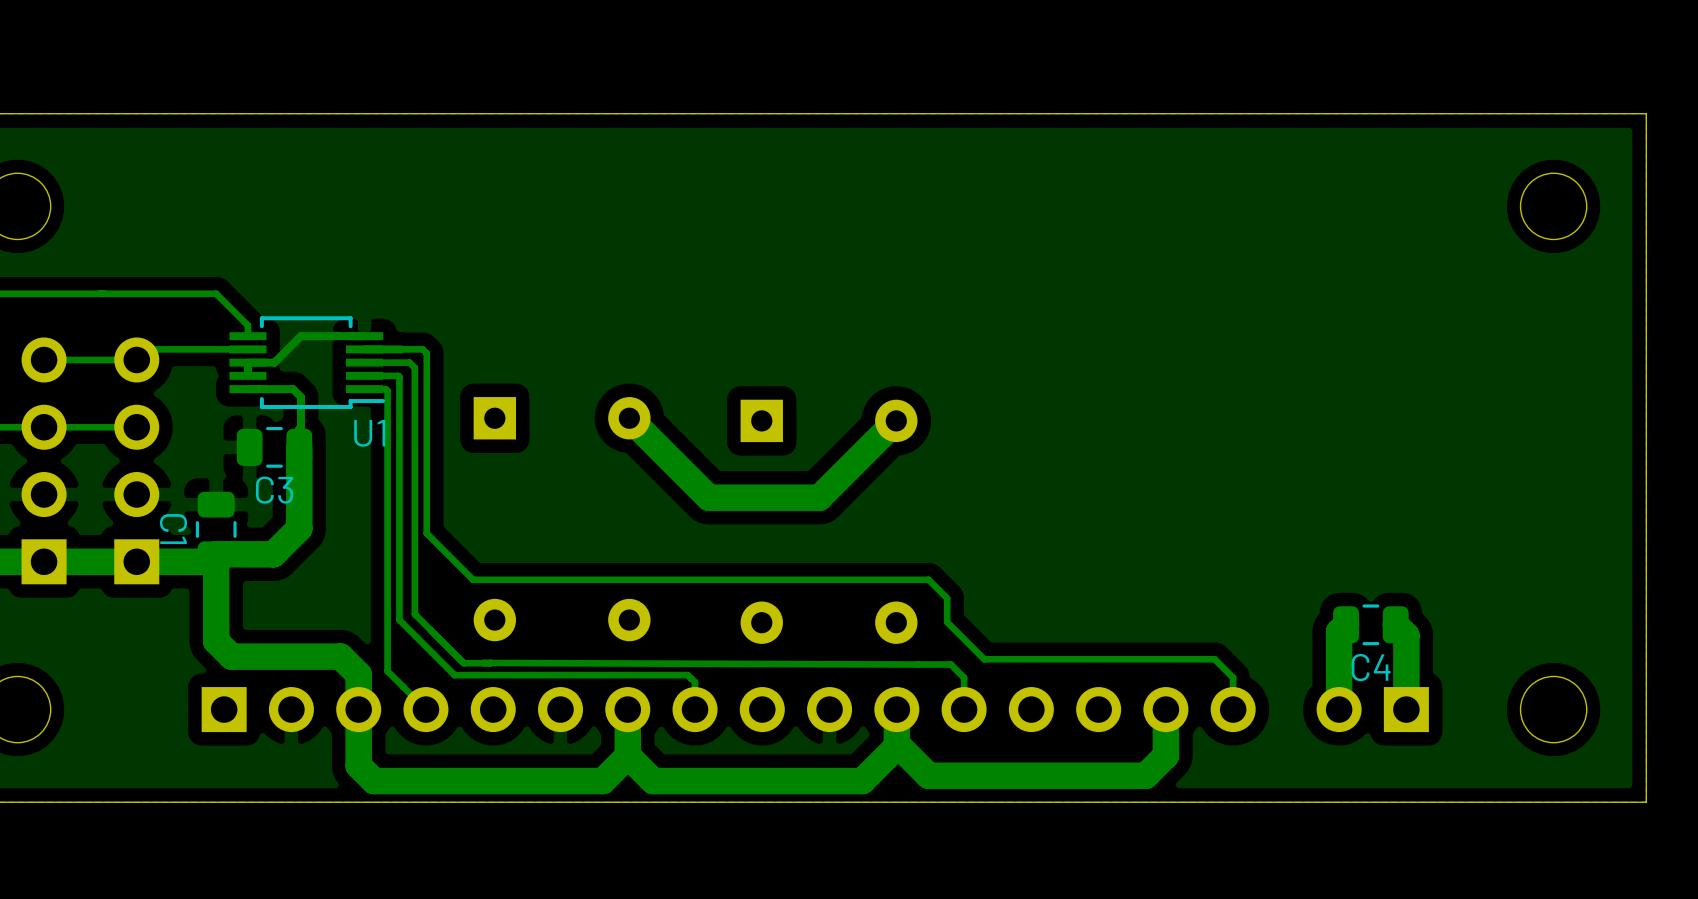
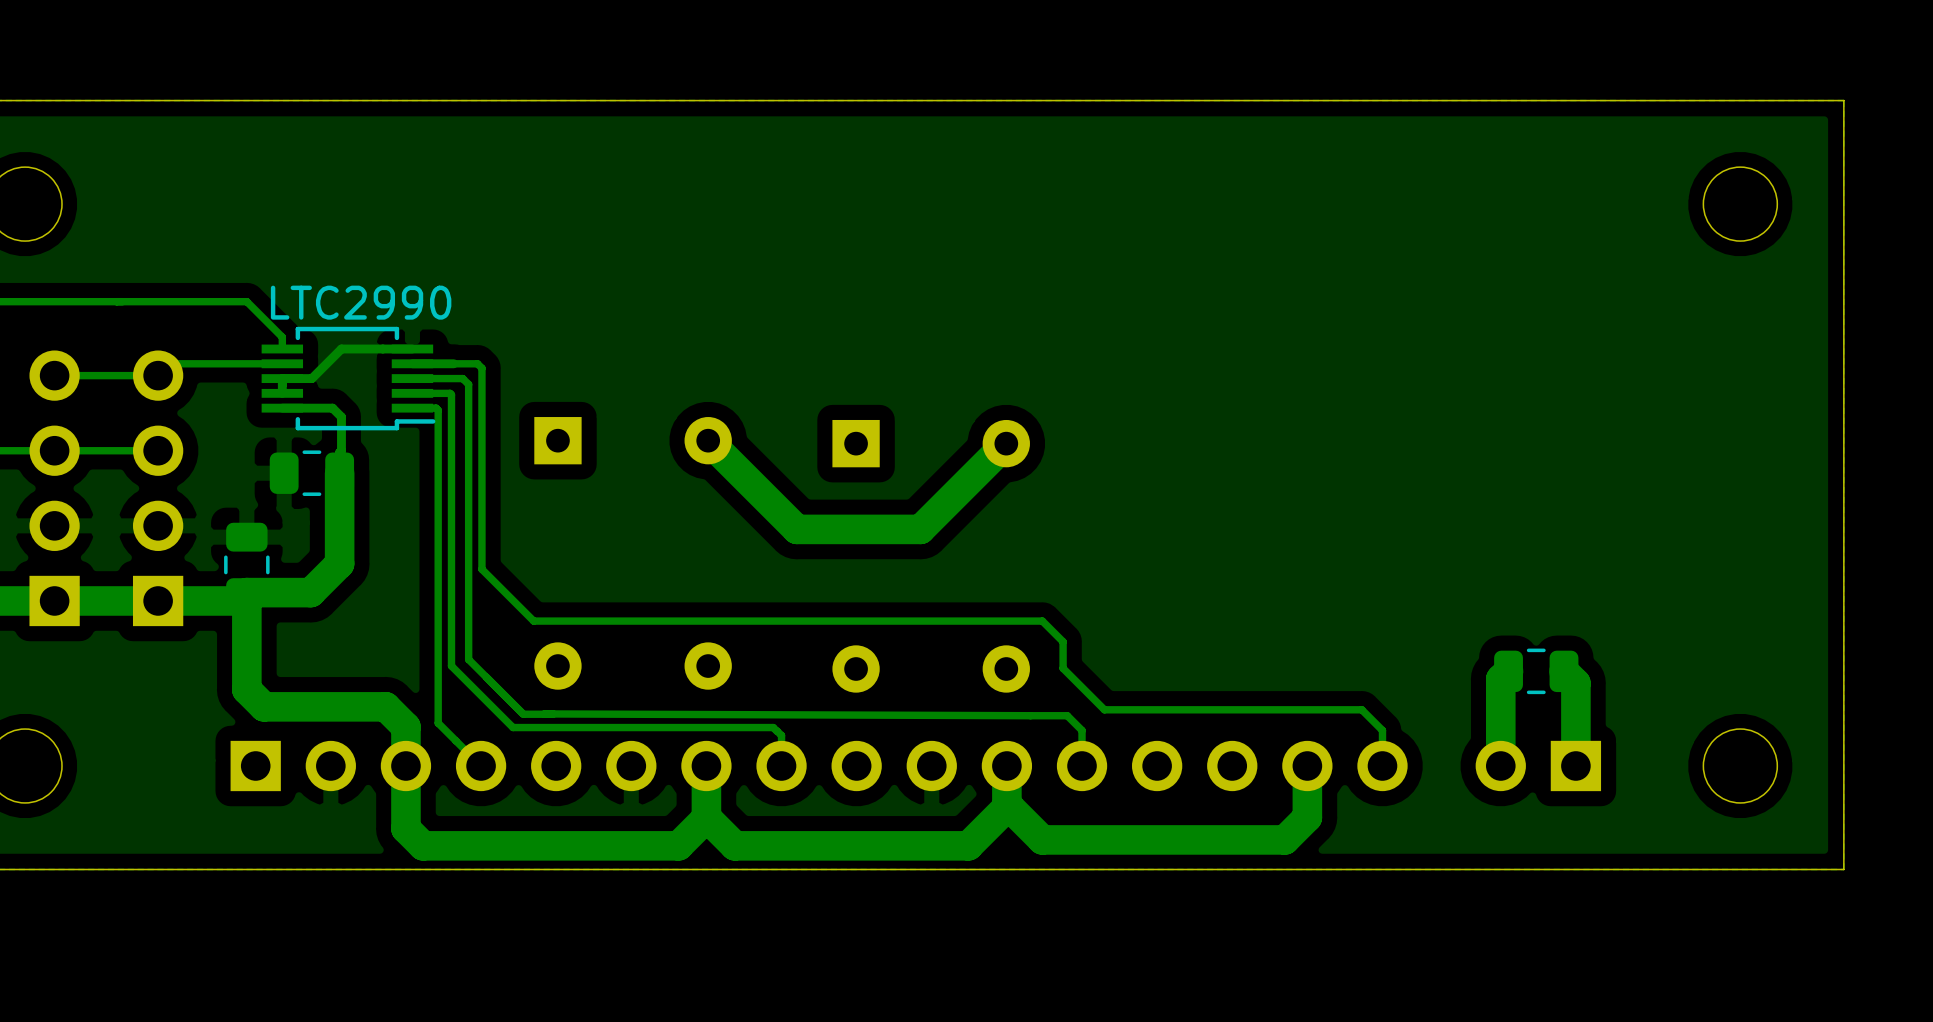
text: none -> LTC2990 (361, 302)
U1 name: U1 (369, 433) -> none
C3 name: C3 (274, 490) -> none
C1 name: C1 (173, 529) -> none
C4 name: C4 (1371, 667) -> none

